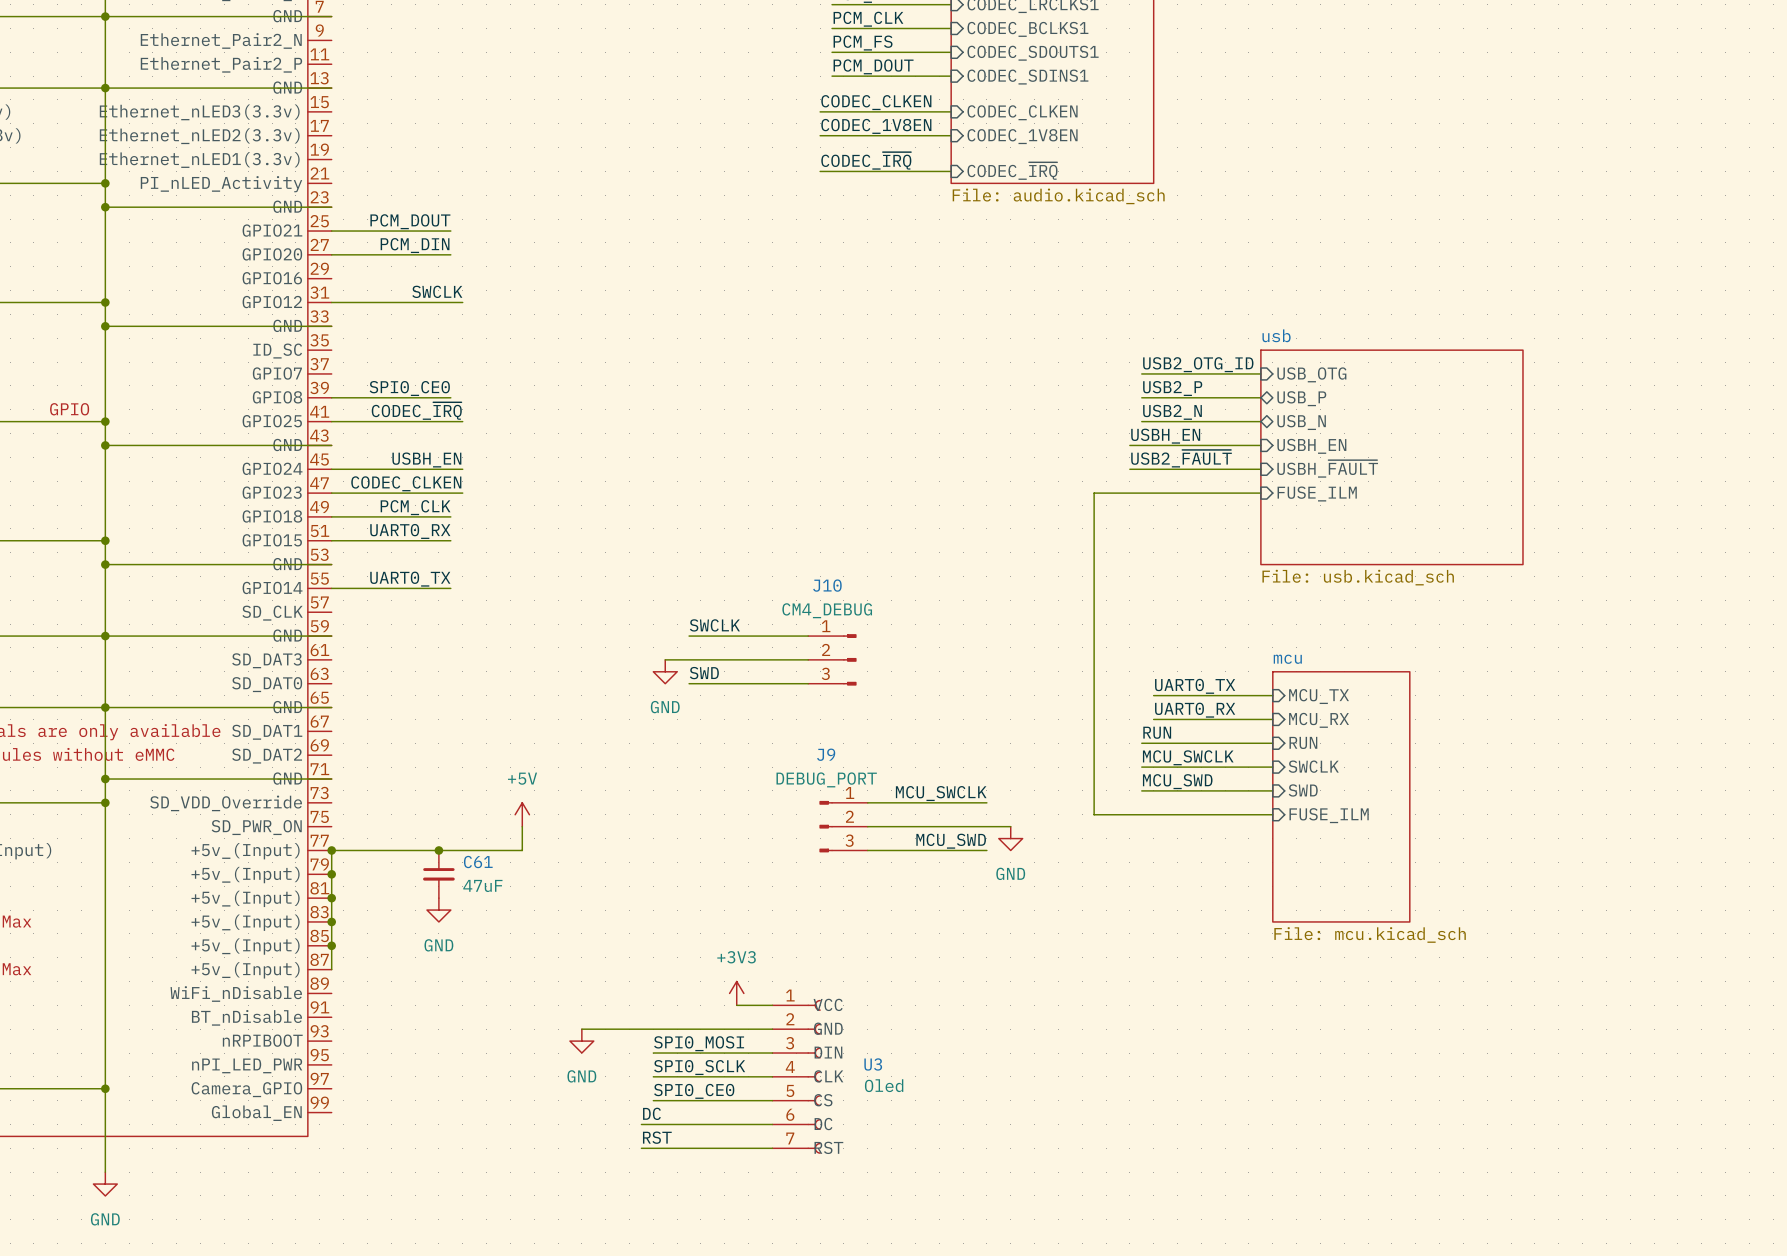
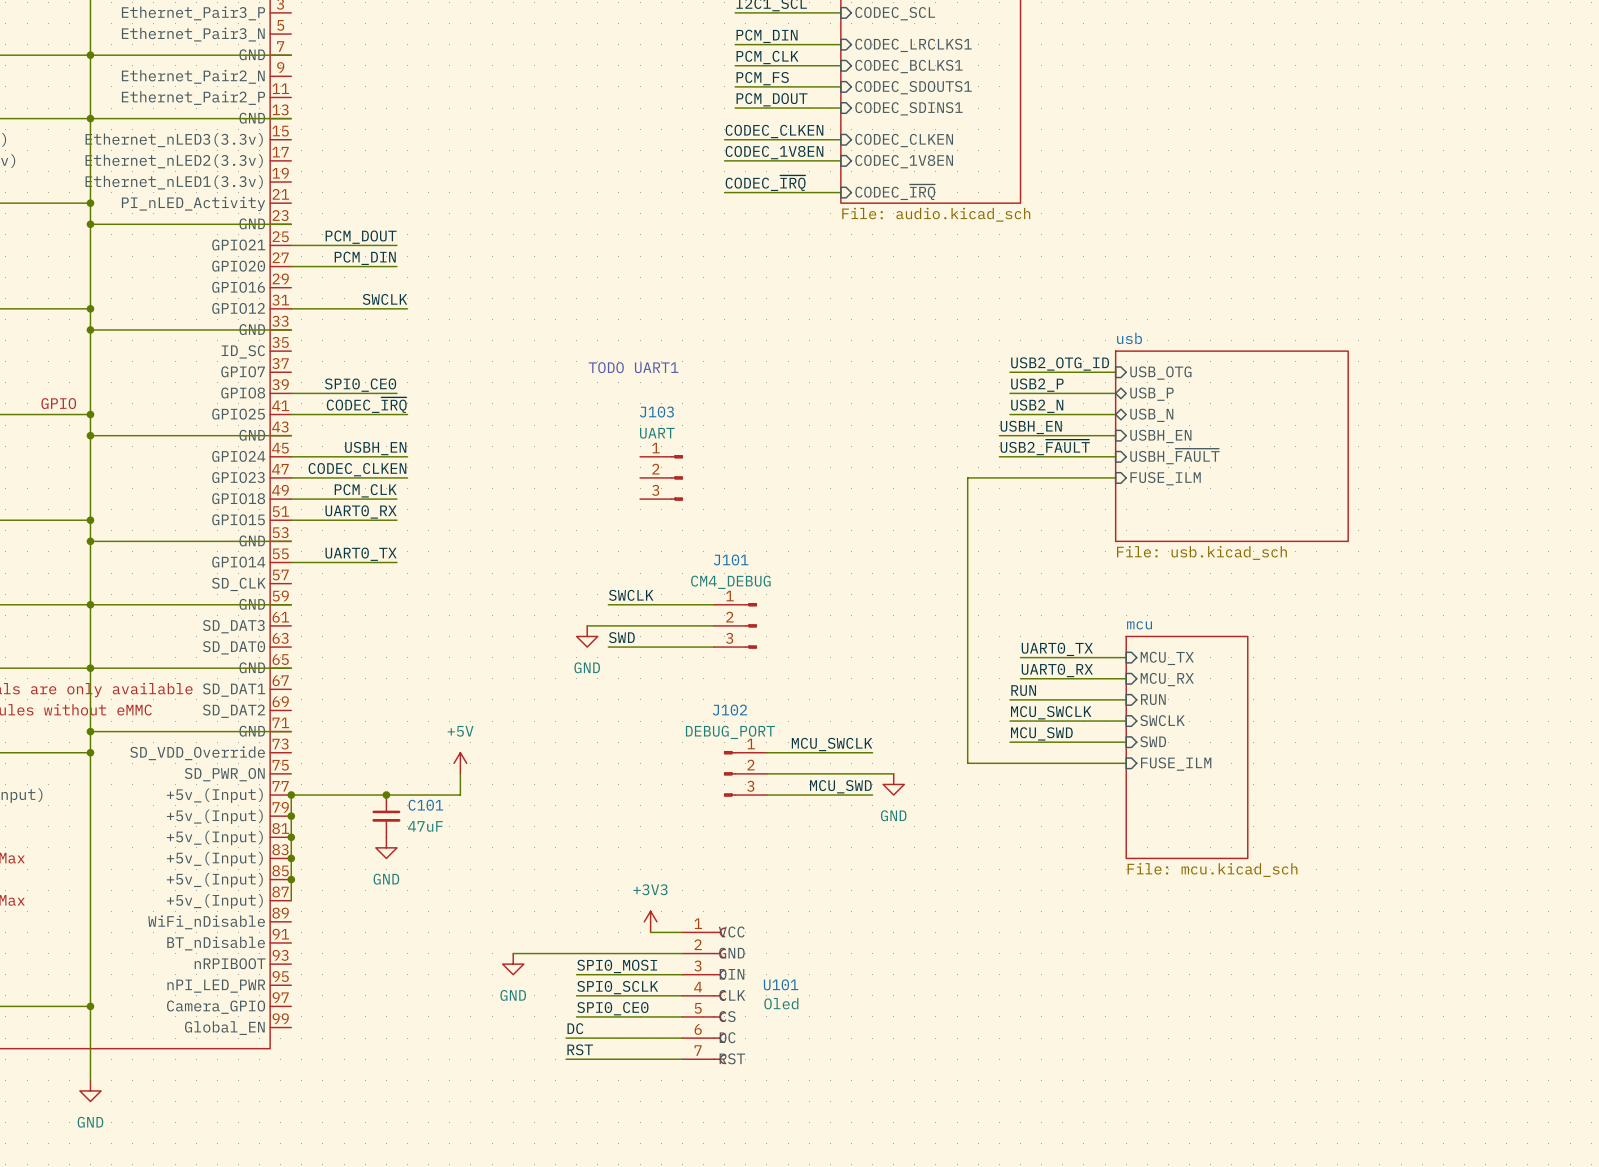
text: none -> TODO UART1 (633, 367)
J103: none -> UART (661, 477)
J10 name: J10 (827, 585) -> J101 (731, 559)
J9 name: J9 (826, 754) -> J102 (729, 710)
C61 name: C61 (478, 862) -> C101 (425, 805)
U3 name: U3 (873, 1064) -> U101 (781, 984)

